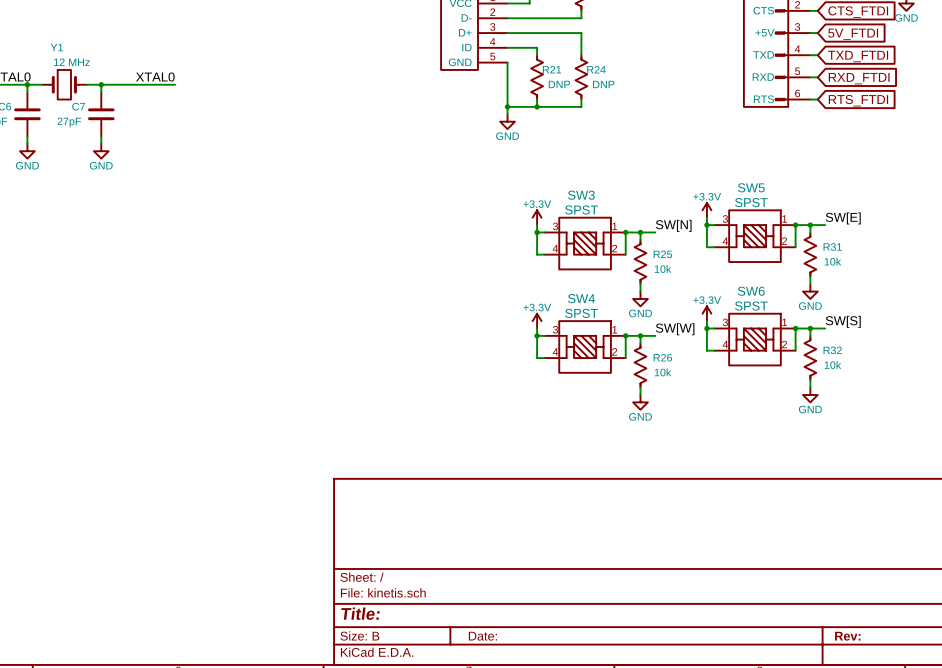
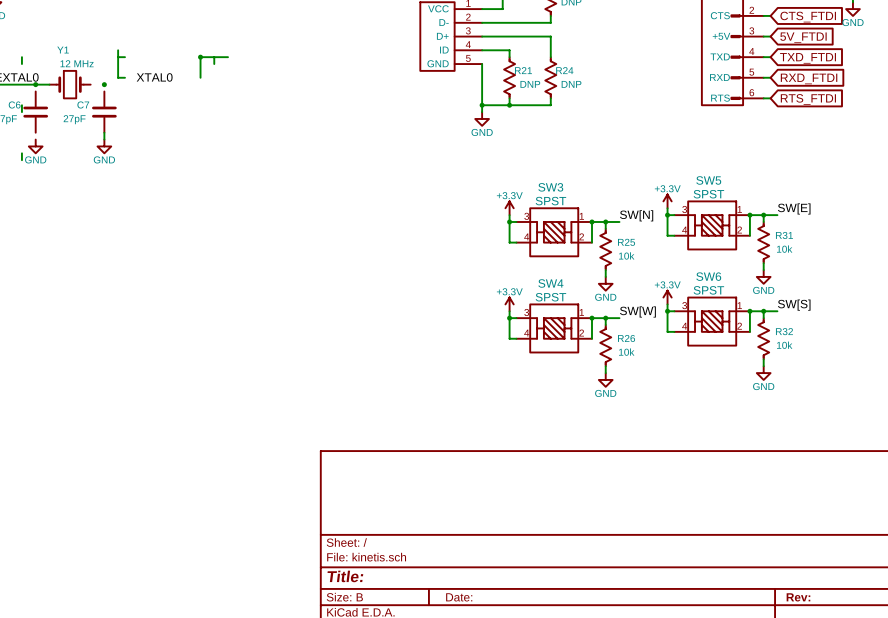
wire: none -> (118, 50) (118, 77) (124, 77)
wire: none -> (118, 57) (124, 57)
junction: none -> (200, 57)
wire: none -> (214, 57) (214, 64)
wire: none -> (228, 57) (200, 57) (200, 77)
wire: (27, 84) (27, 92) -> (21, 105) (21, 112)
wire: (86, 84) (175, 84) -> none
wire: (101, 84) (101, 92) -> (21, 57) (21, 64)
wire: (27, 136) (27, 143) -> (21, 153) (21, 160)

